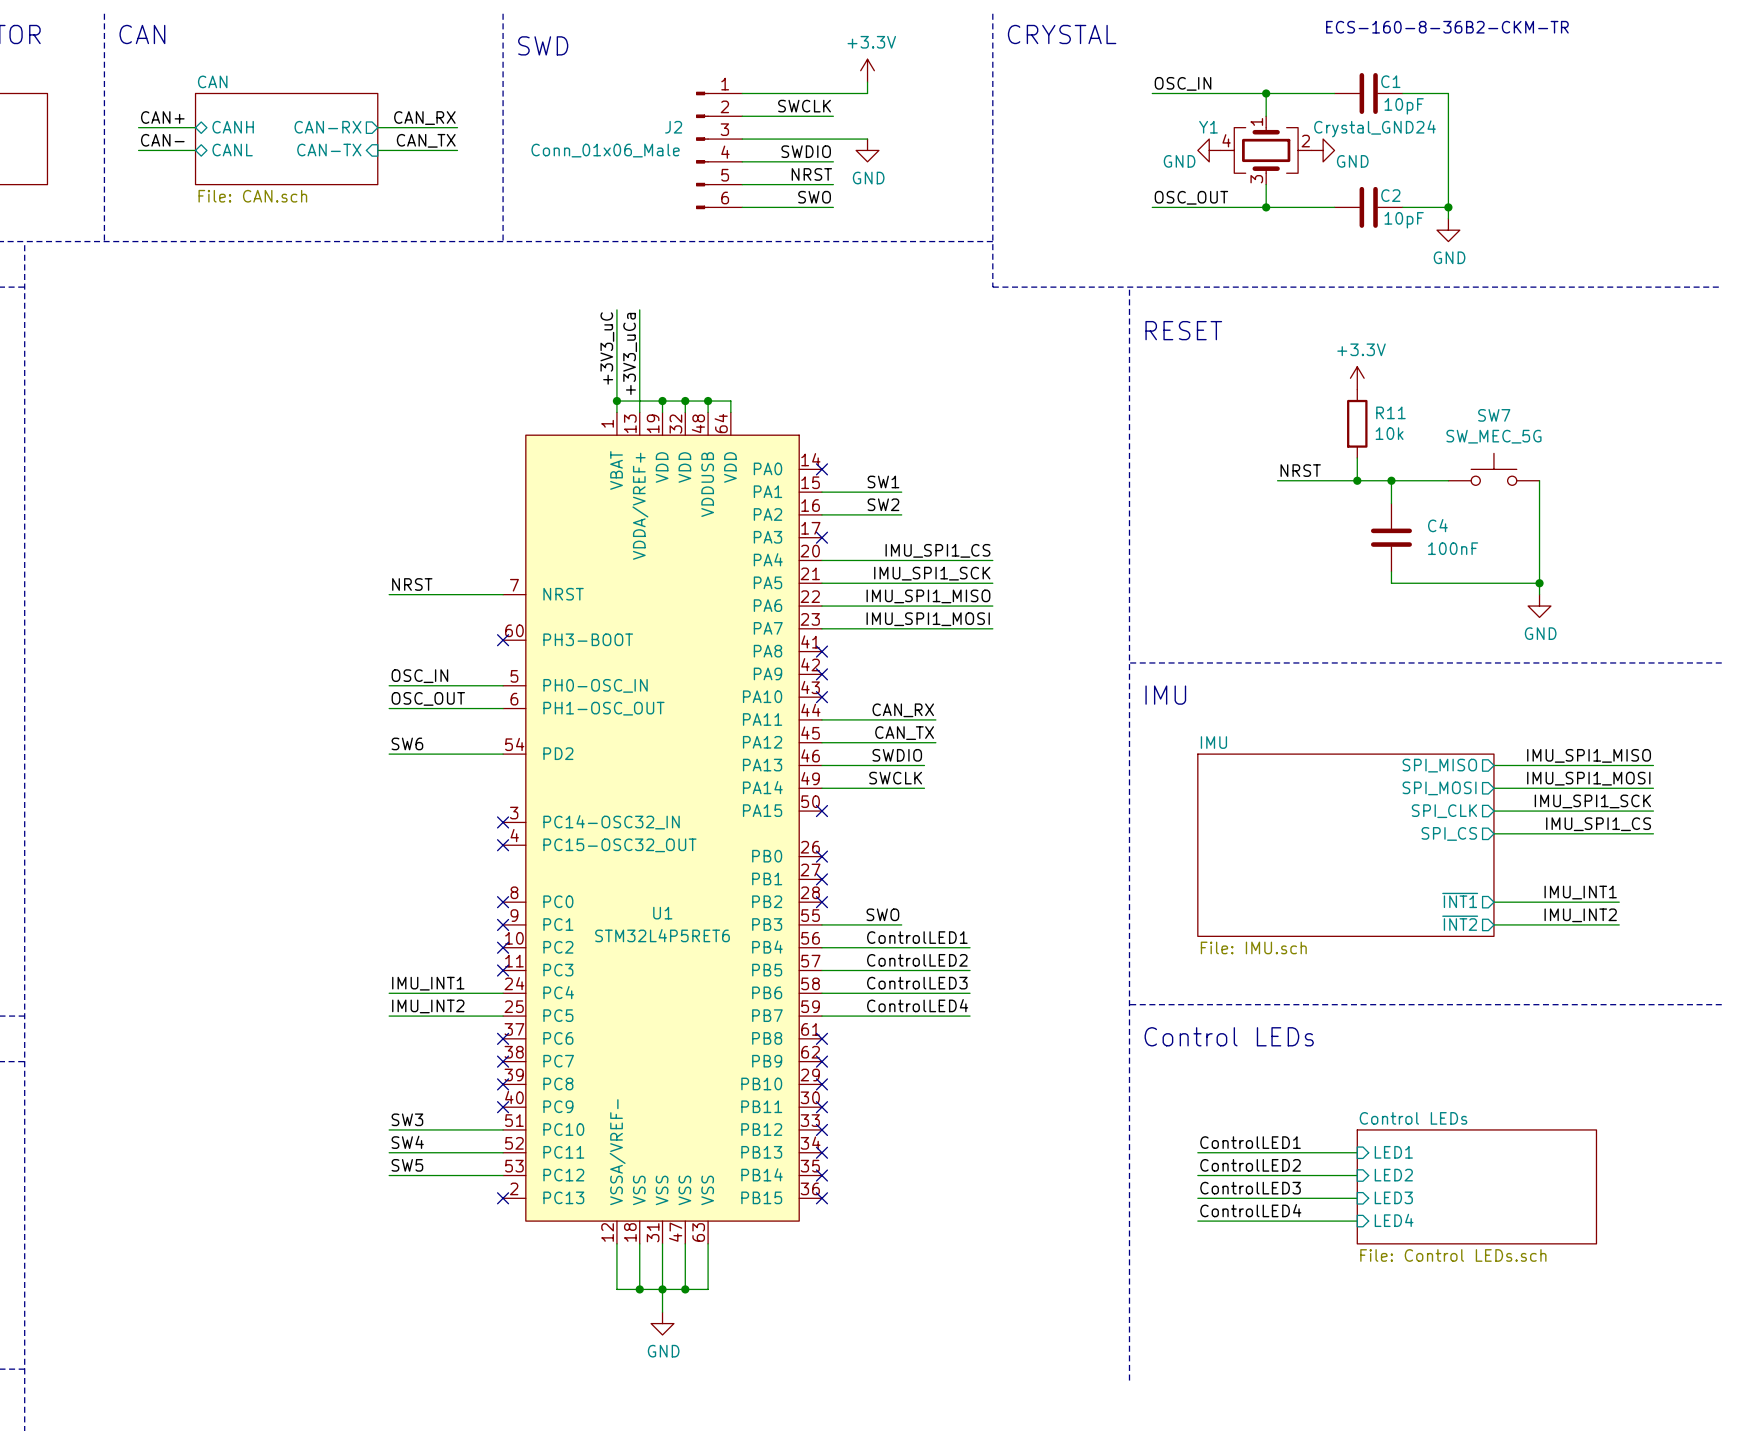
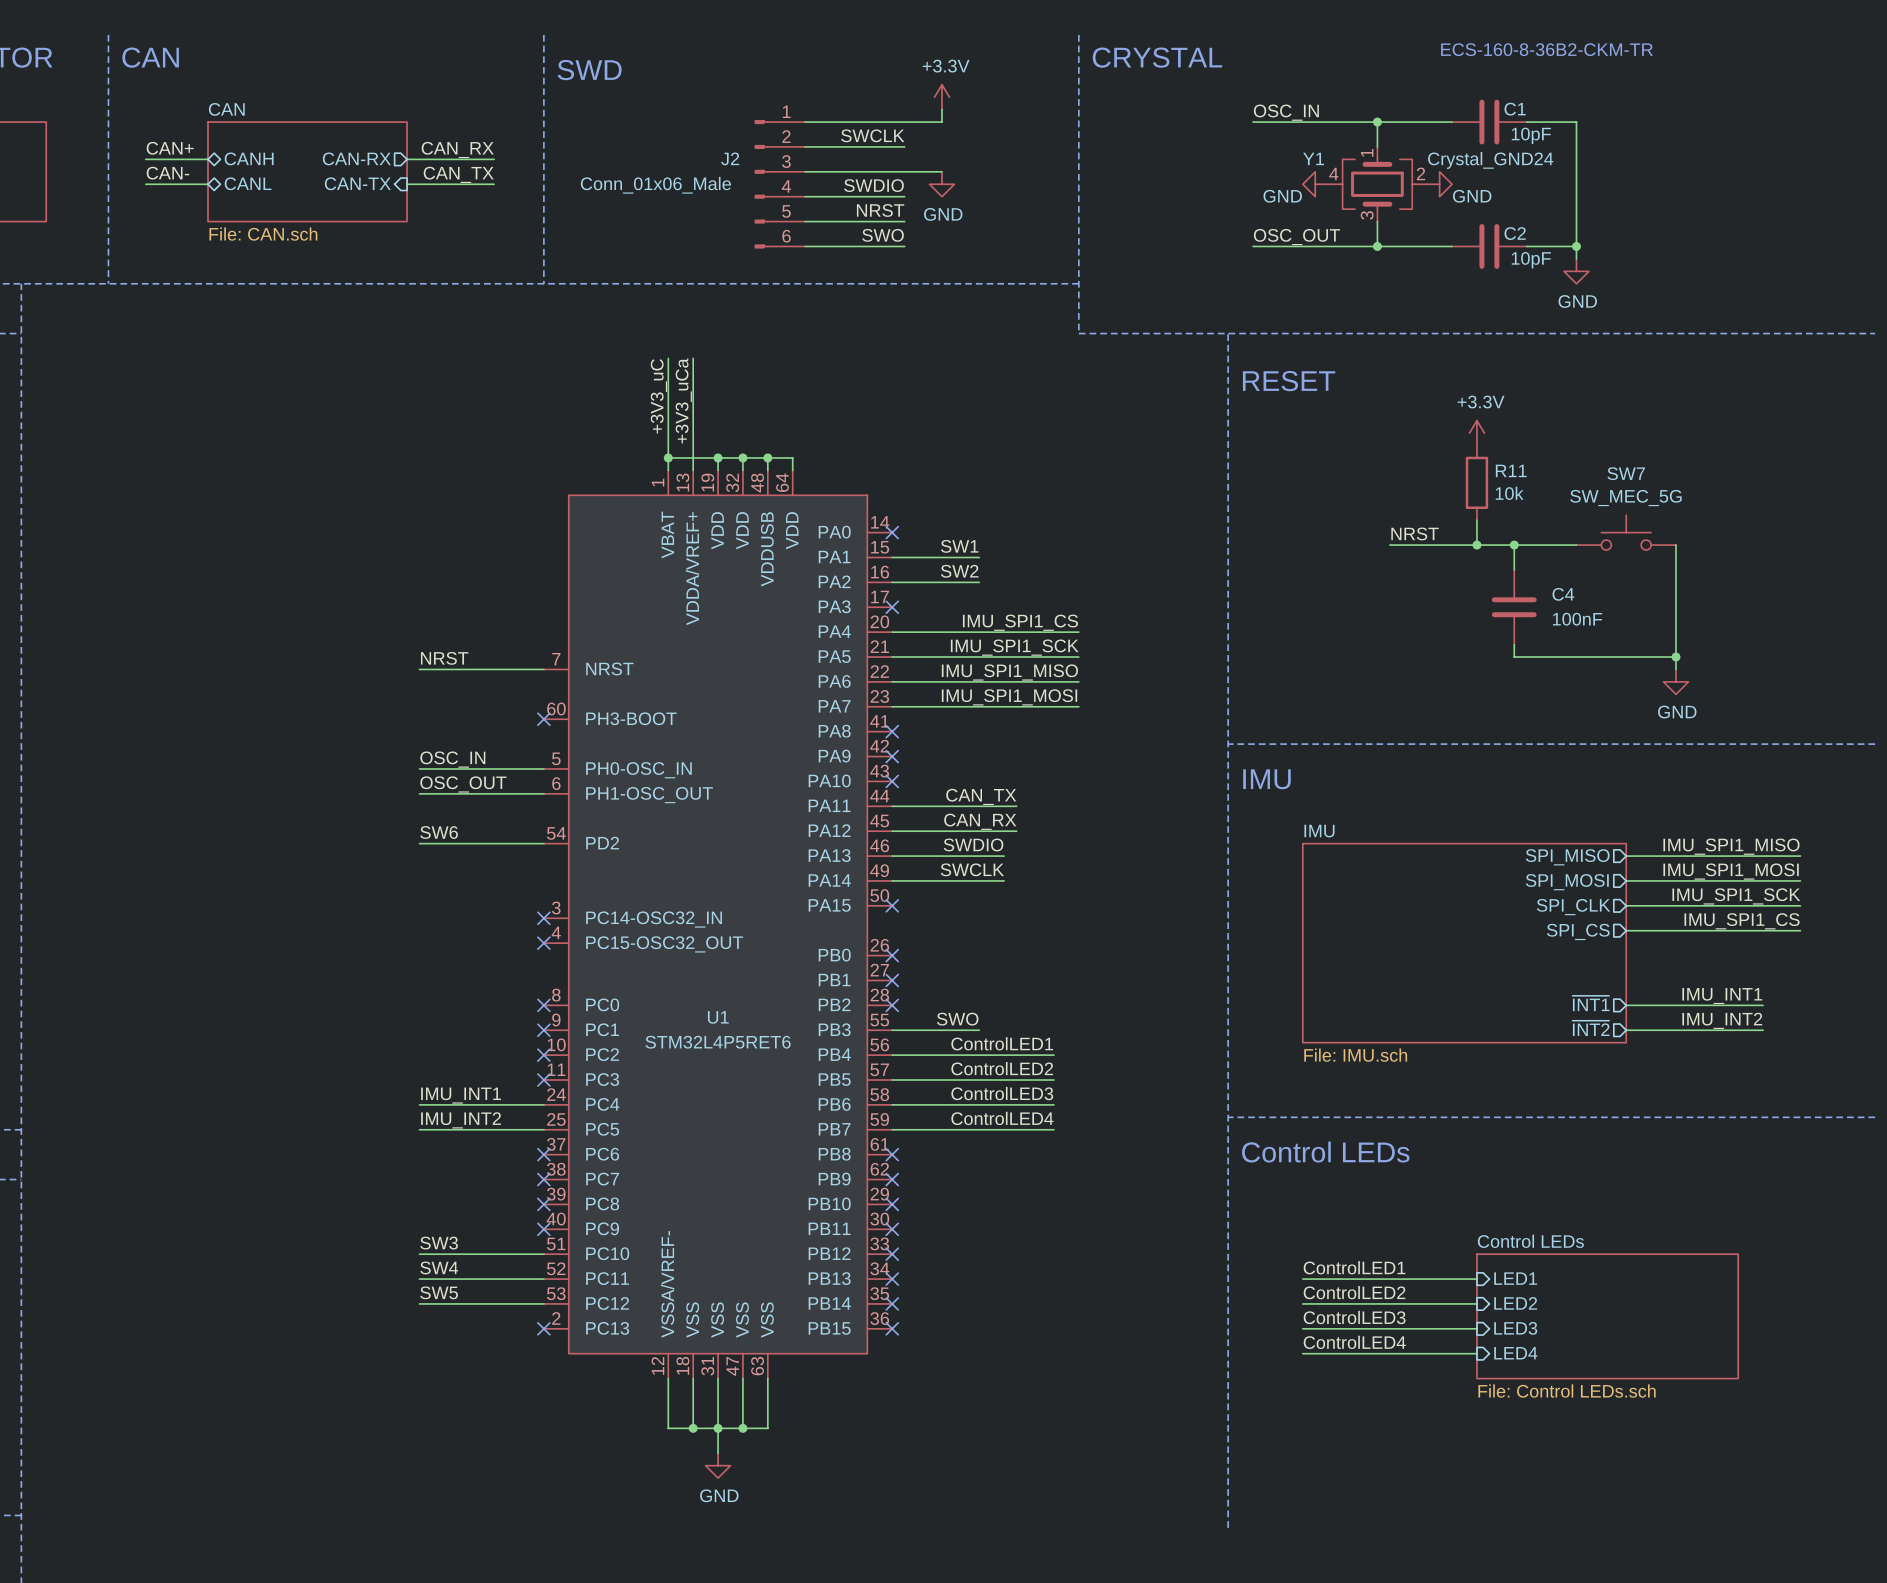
label: CAN_RX (903, 710) -> CAN_TX (981, 796)
label: CAN_TX (904, 733) -> CAN_RX (980, 821)

